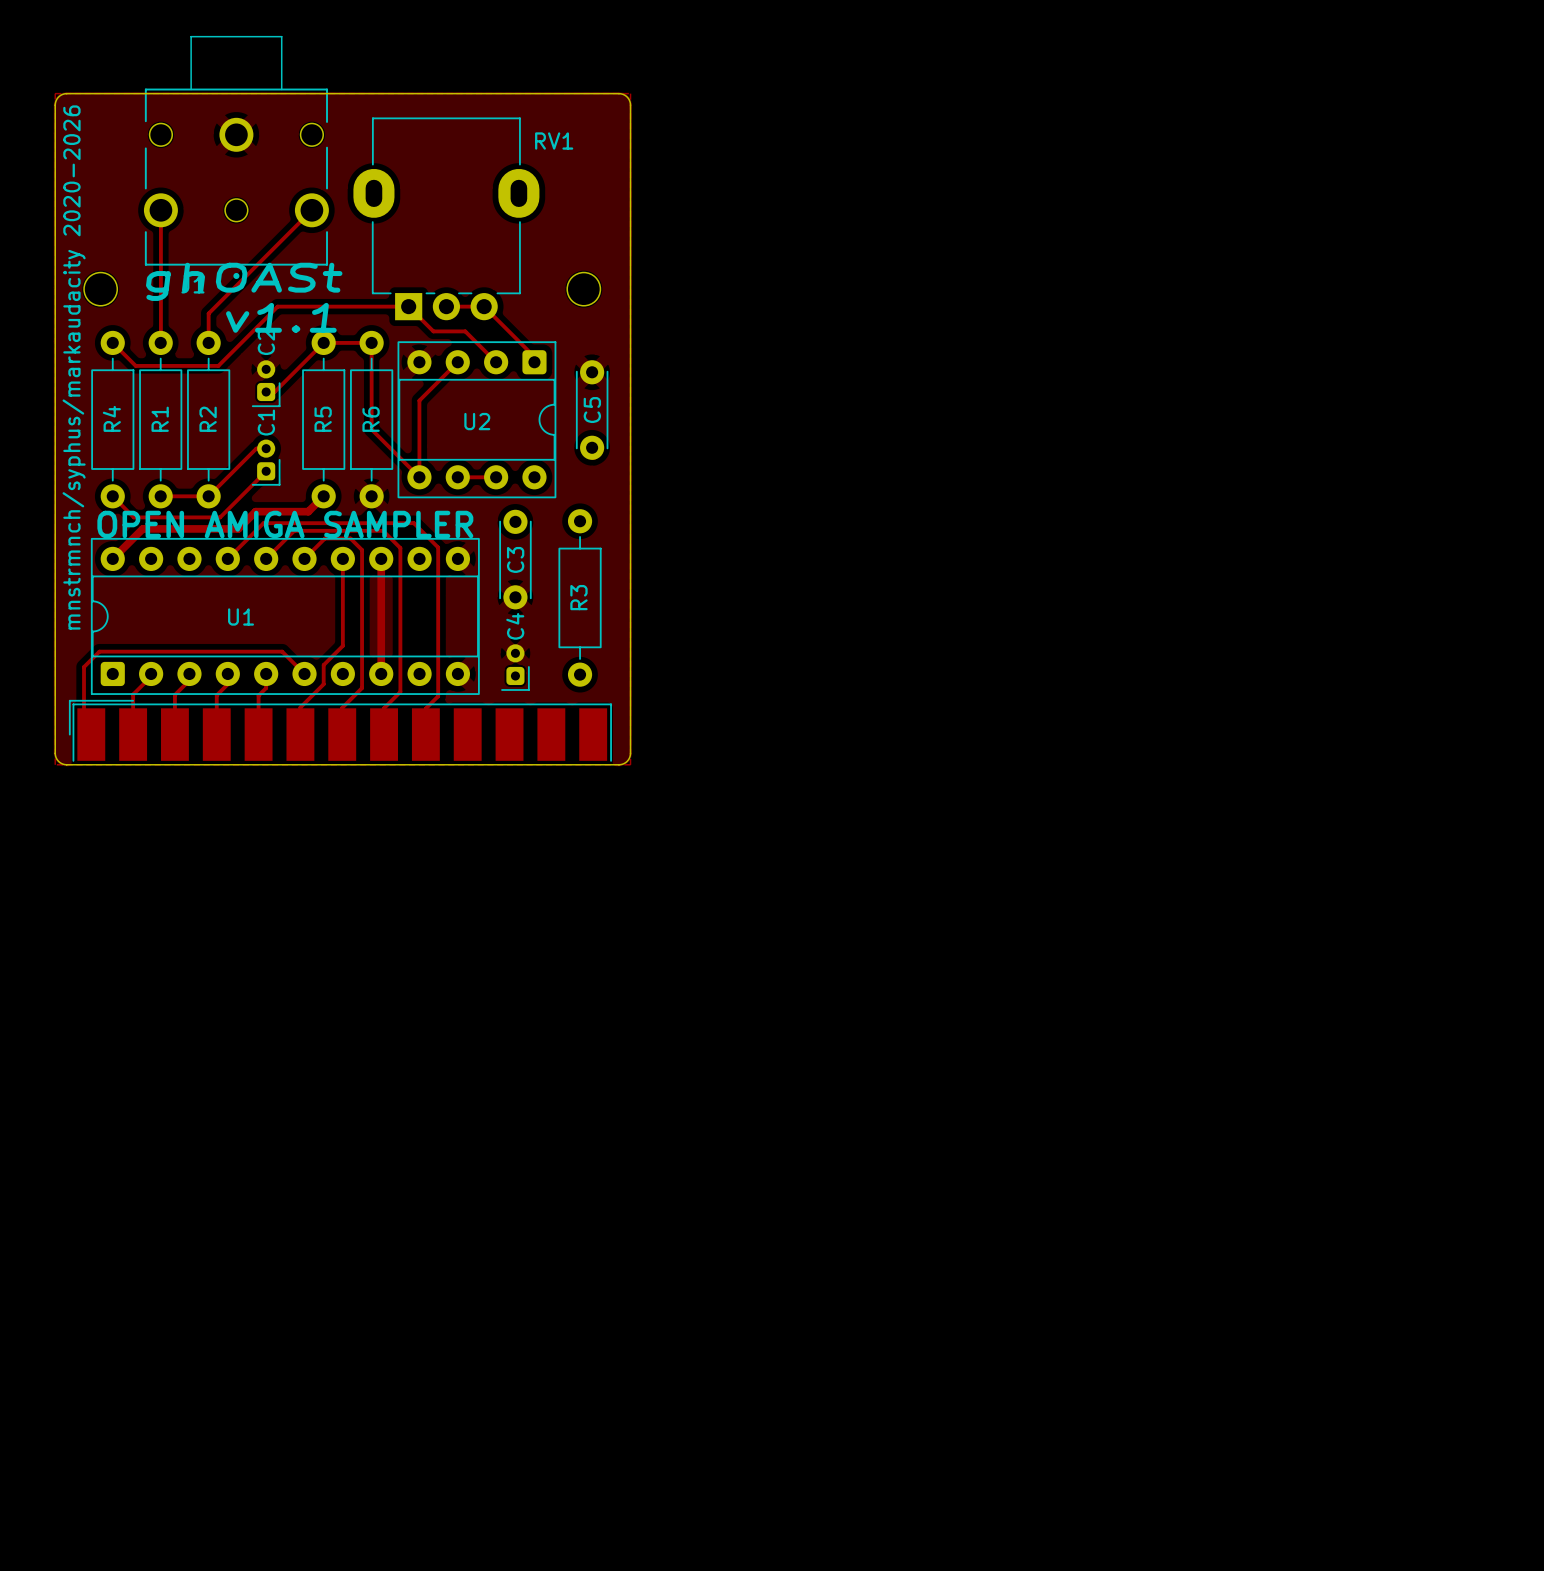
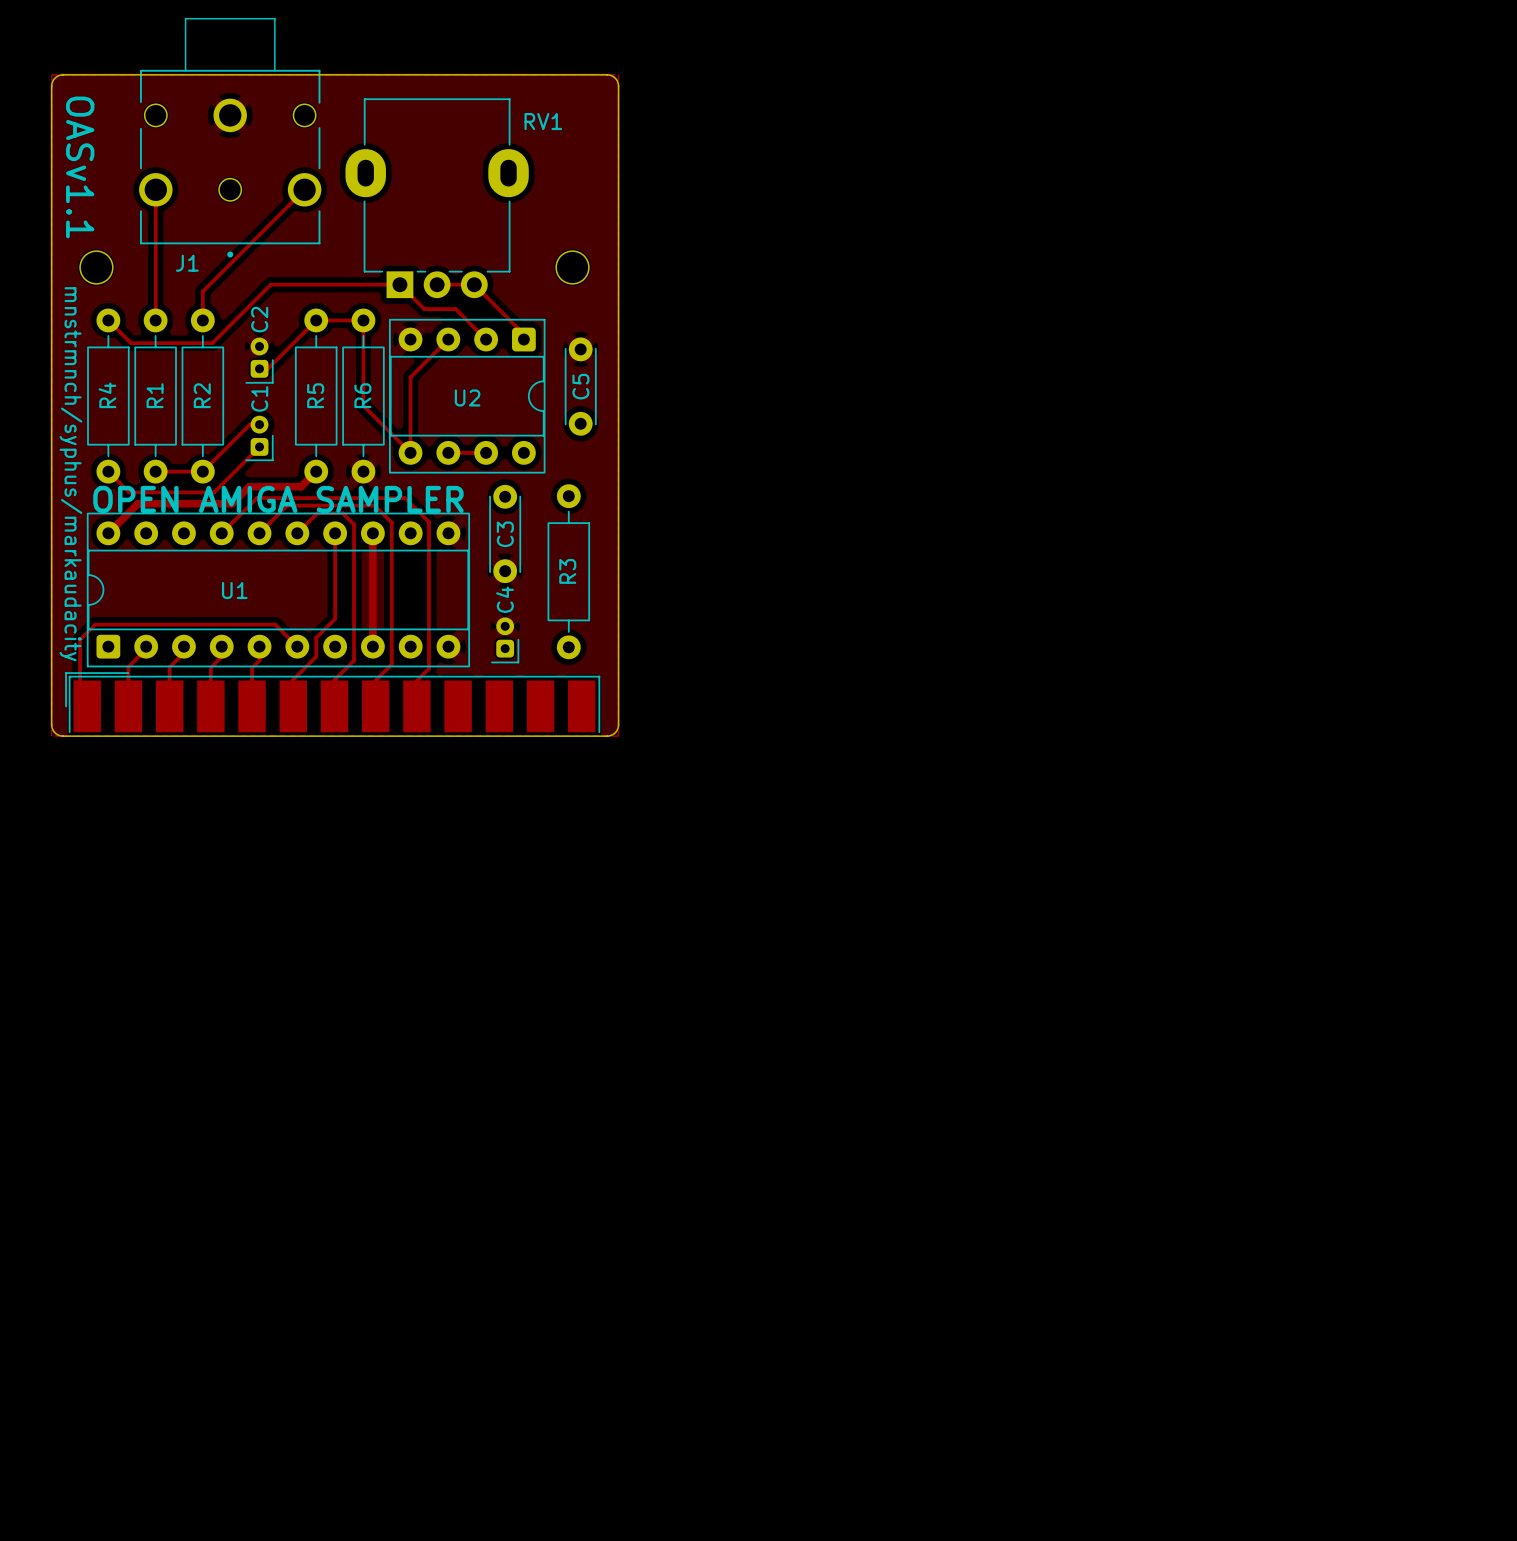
text: none -> OASv1.1 (80, 167)
text: ghOASt (244, 281) -> none
text: v1.1 (281, 317) -> none
text: mnstrmnch/syphus/markaudacity 2020-2026 (74, 367) -> mnstrmnch/syphus/markaudacity (70, 474)

